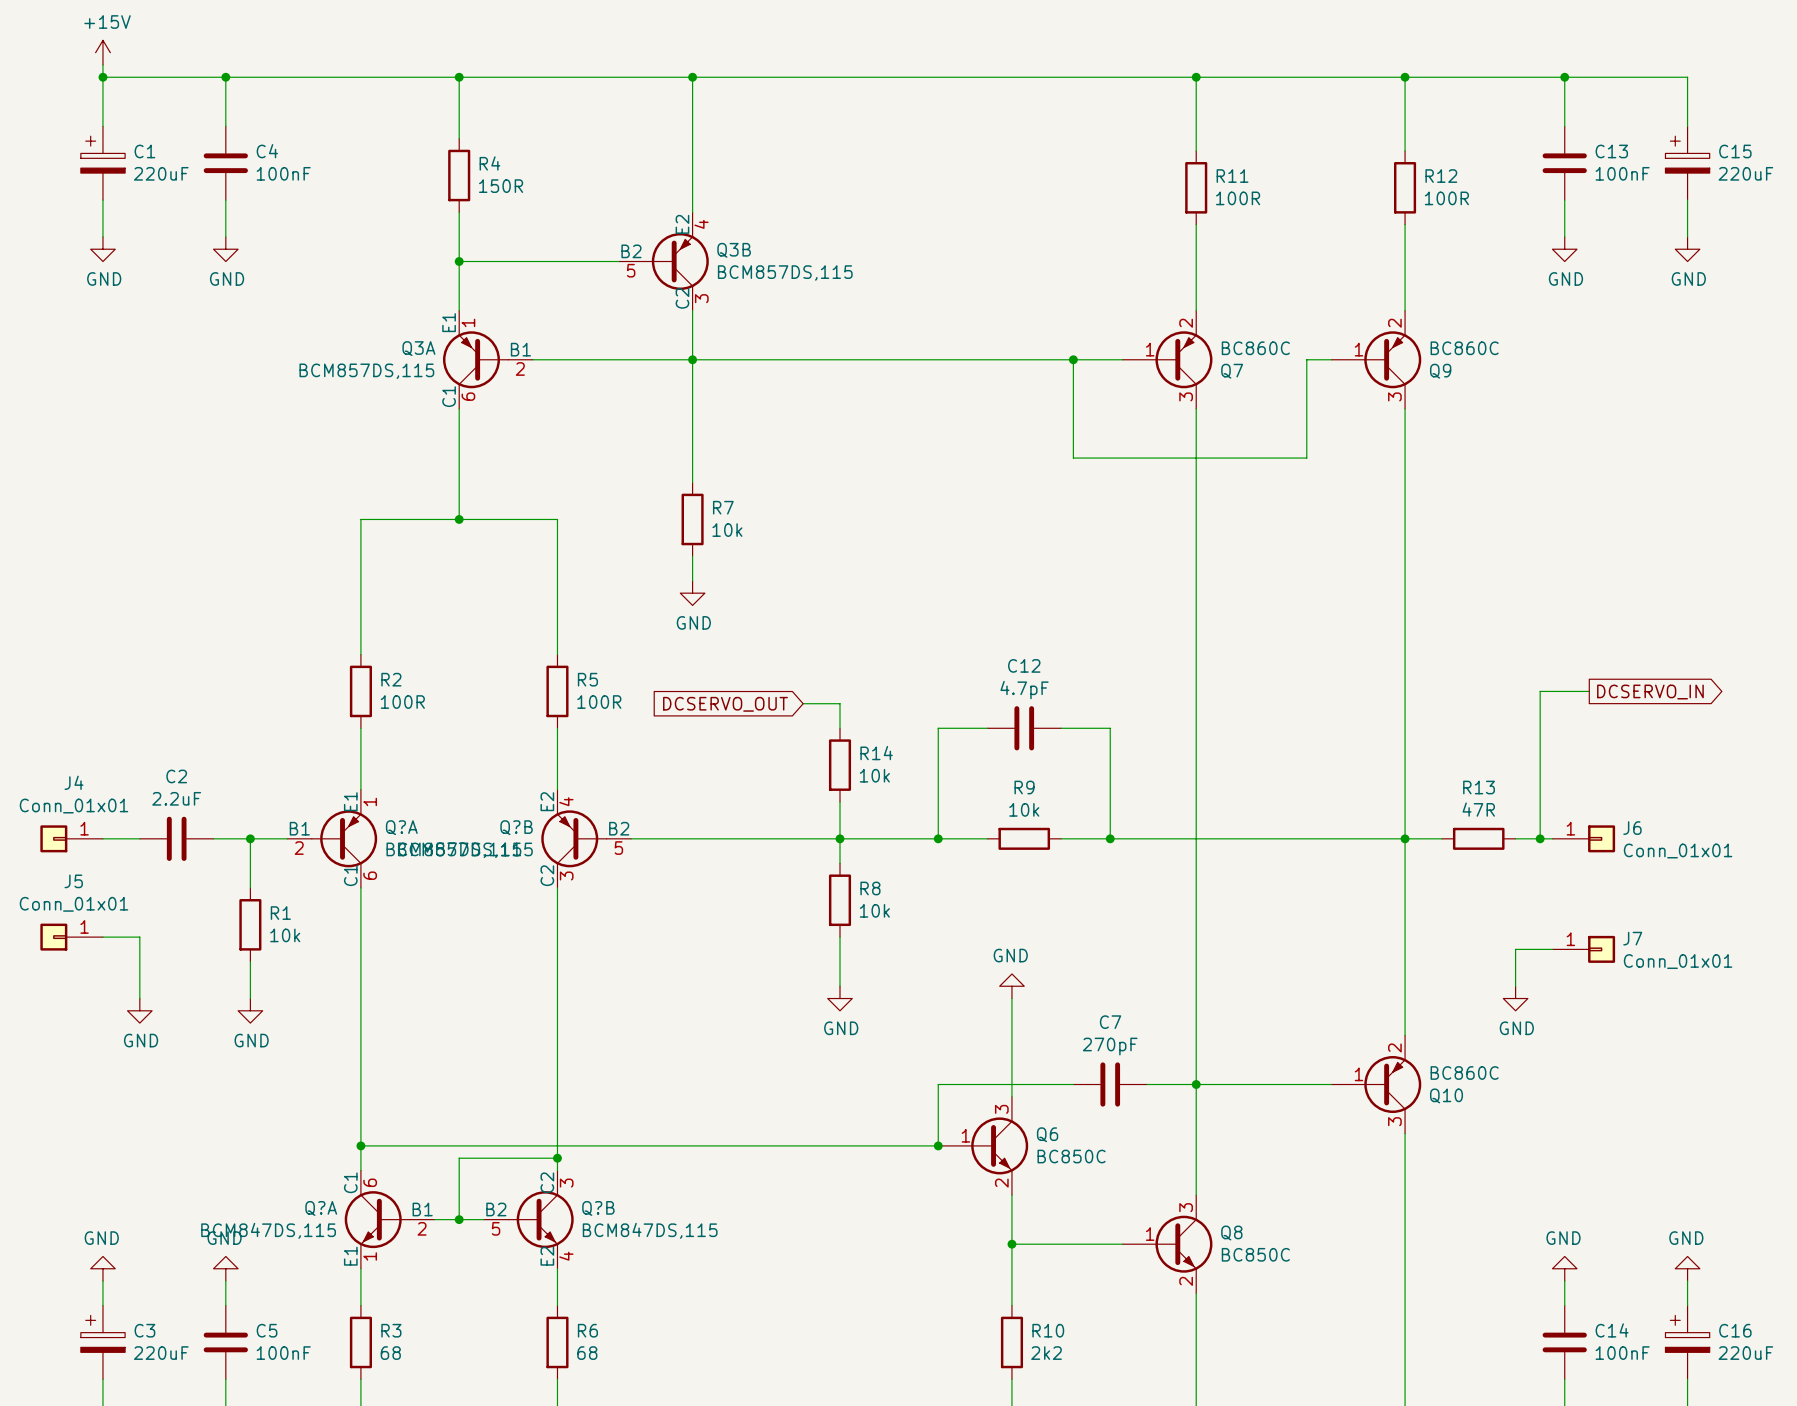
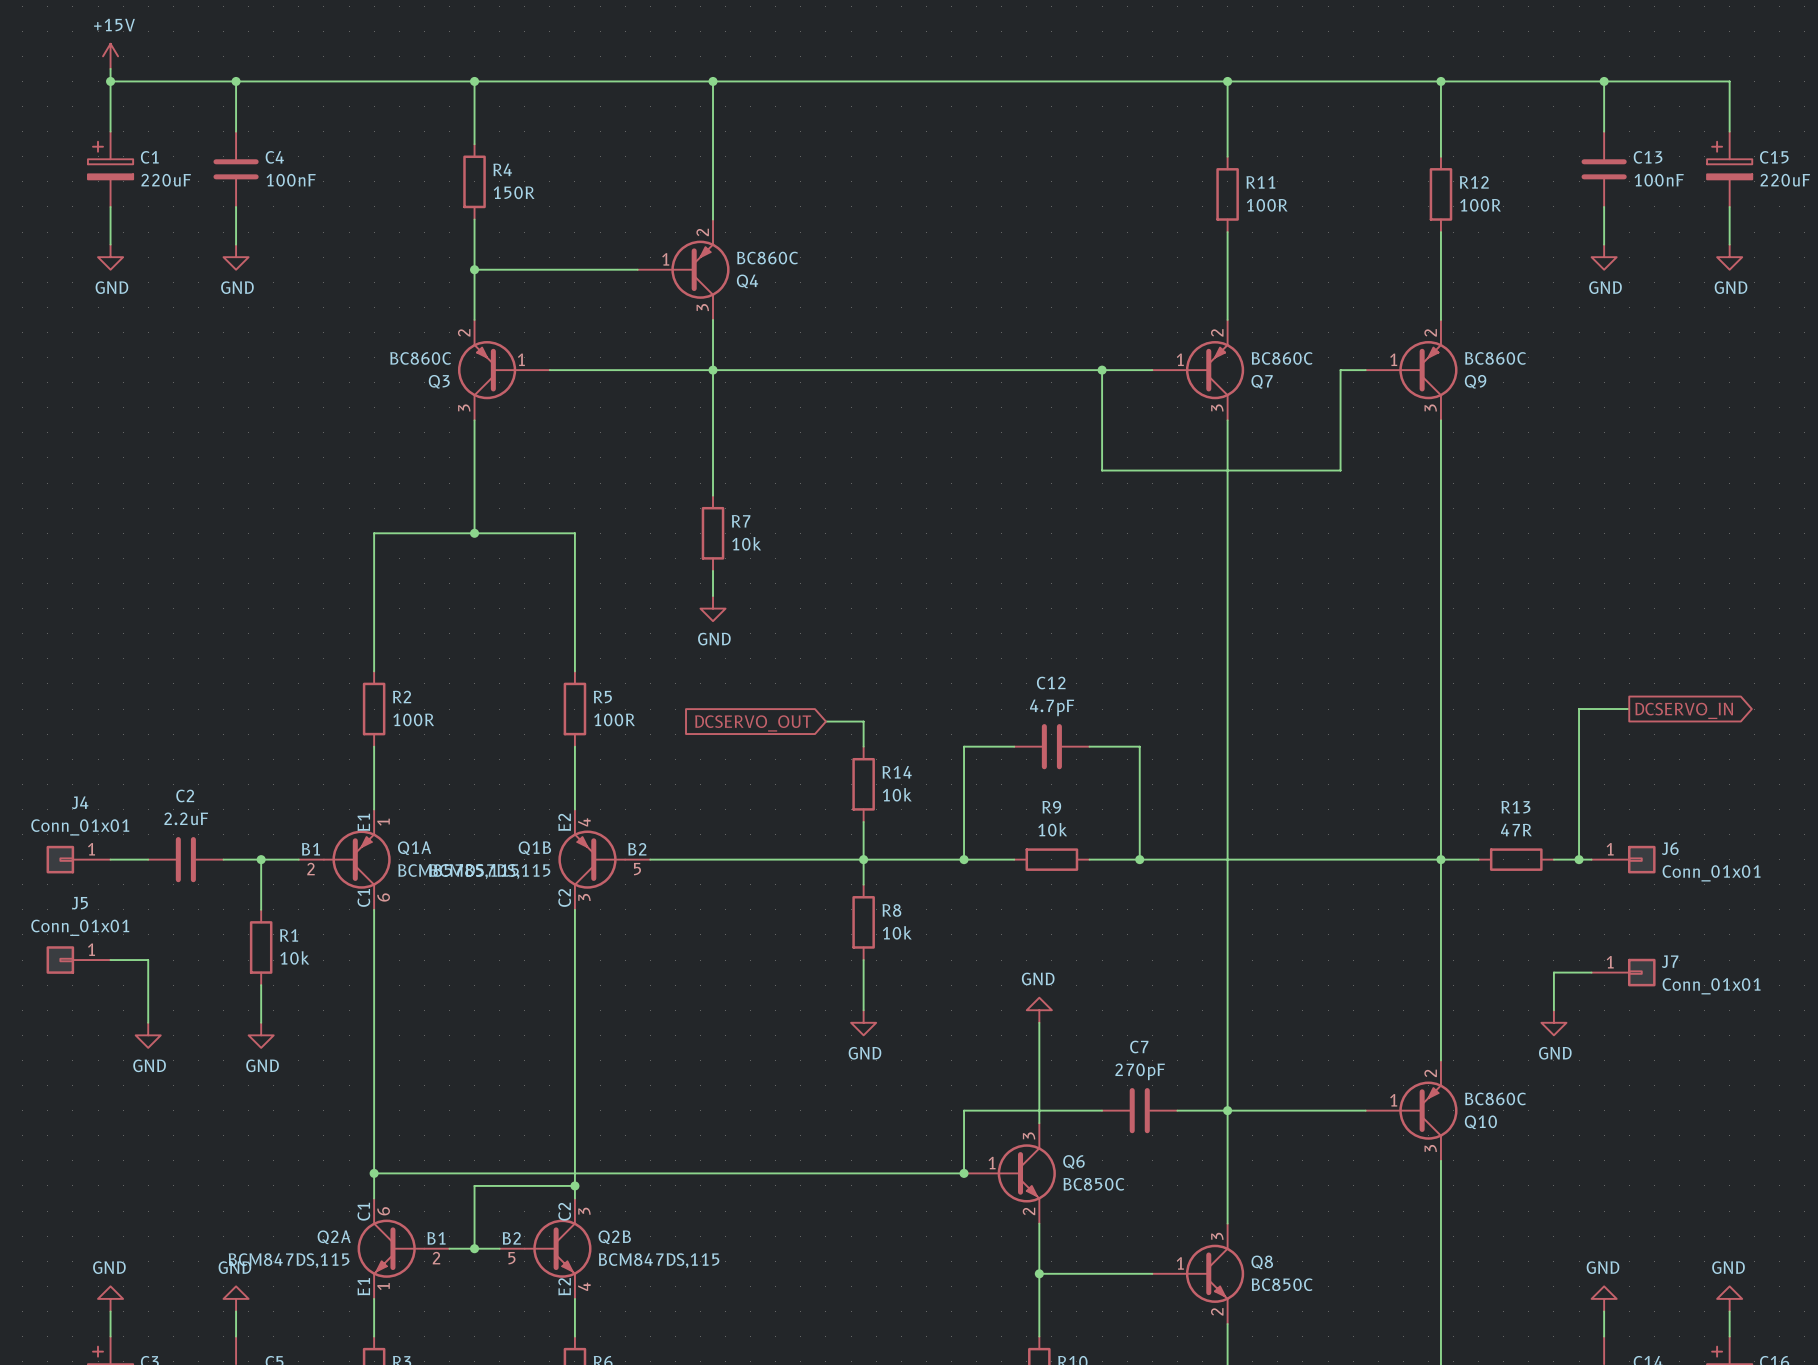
Q3B: BCM857DS,115 (663, 261) -> none
Q4: none -> BC860C (683, 269)
Q3A: BCM857DS,115 (487, 359) -> none
Q3: none -> BC860C (503, 370)
Q?A name: Q?A (401, 827) -> Q1A (414, 848)
Q?B name: Q?B (516, 827) -> Q1B (534, 848)
Q?A name: Q?A (321, 1208) -> Q2A (334, 1237)
Q?B name: Q?B (598, 1208) -> Q2B (614, 1237)

